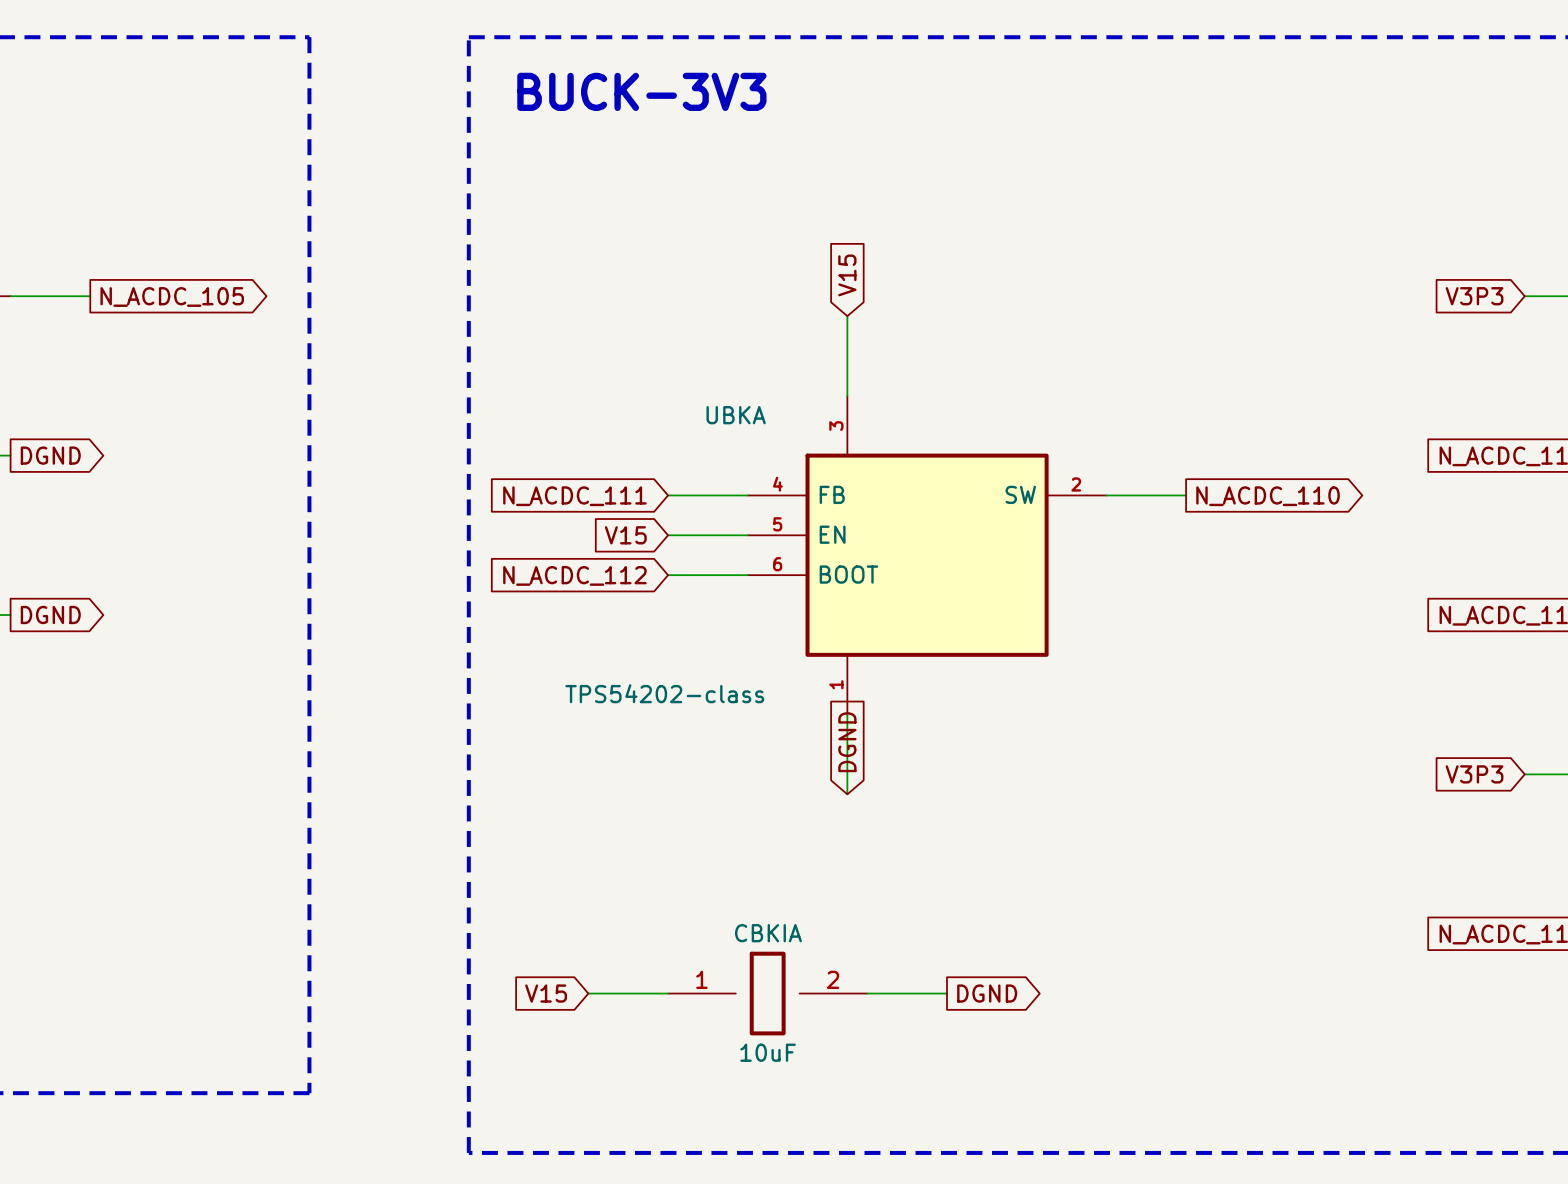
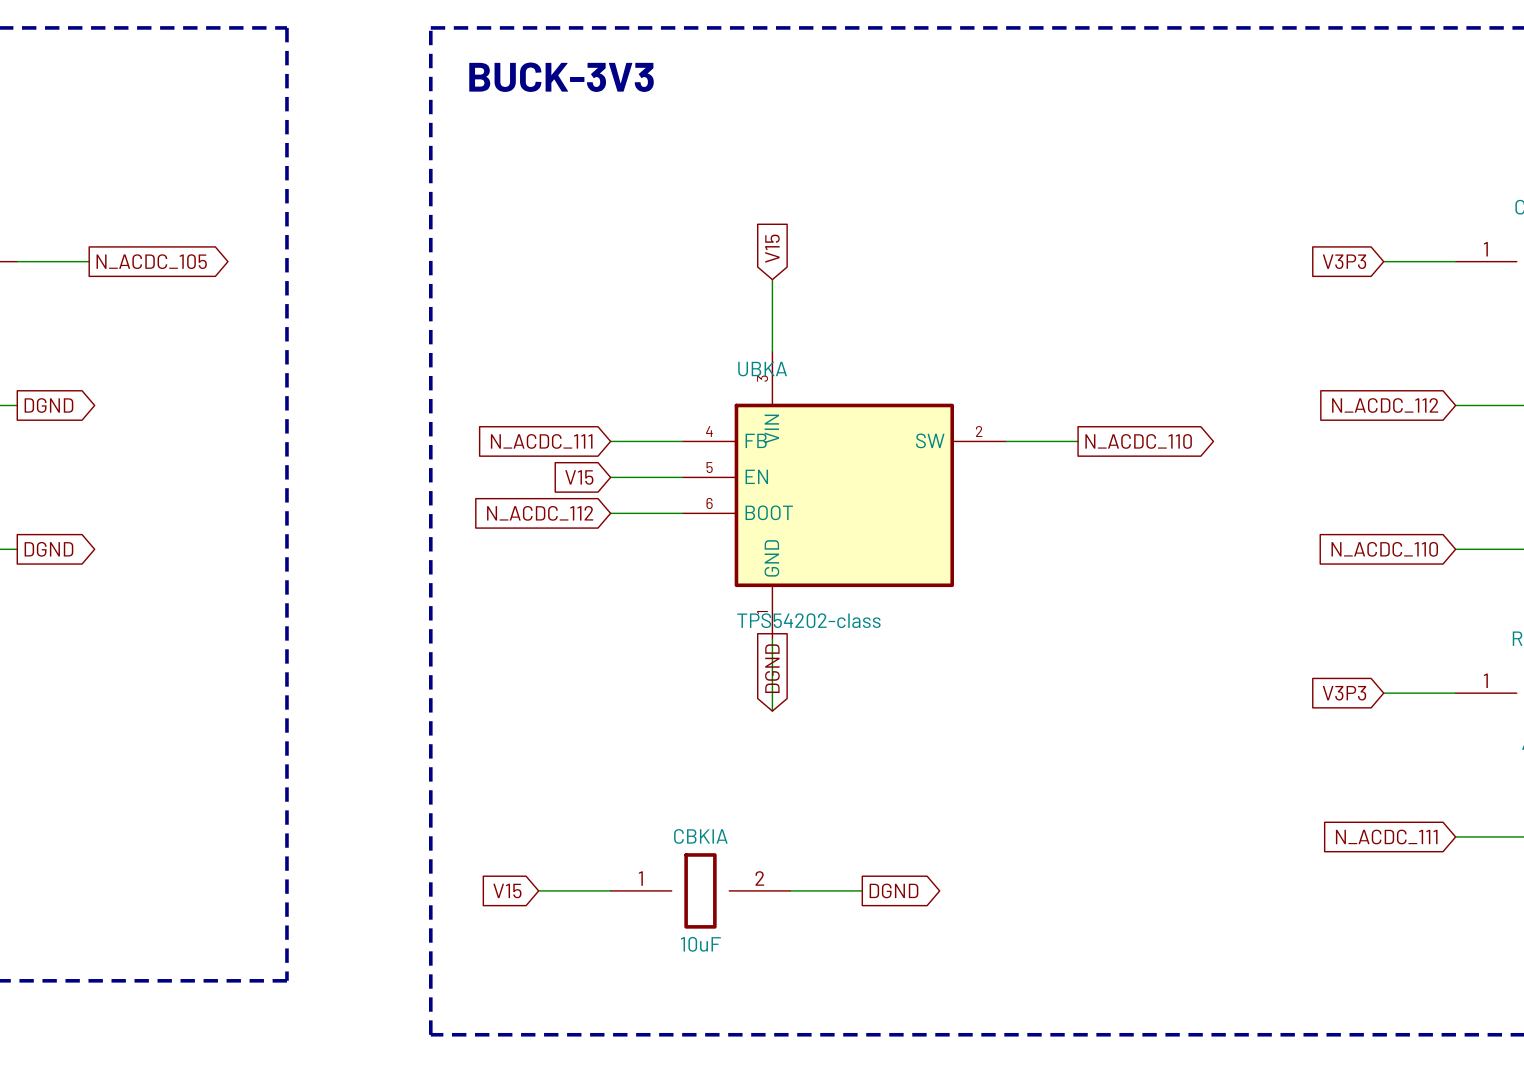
UBKA name position: UBKA (736, 415) -> UBKA (762, 369)
UBKA pin name: none -> VIN (771, 428)
UBKA pin name: none -> GND (771, 558)
UBKA value position: TPS54202-class (664, 693) -> TPS54202-class (808, 620)

